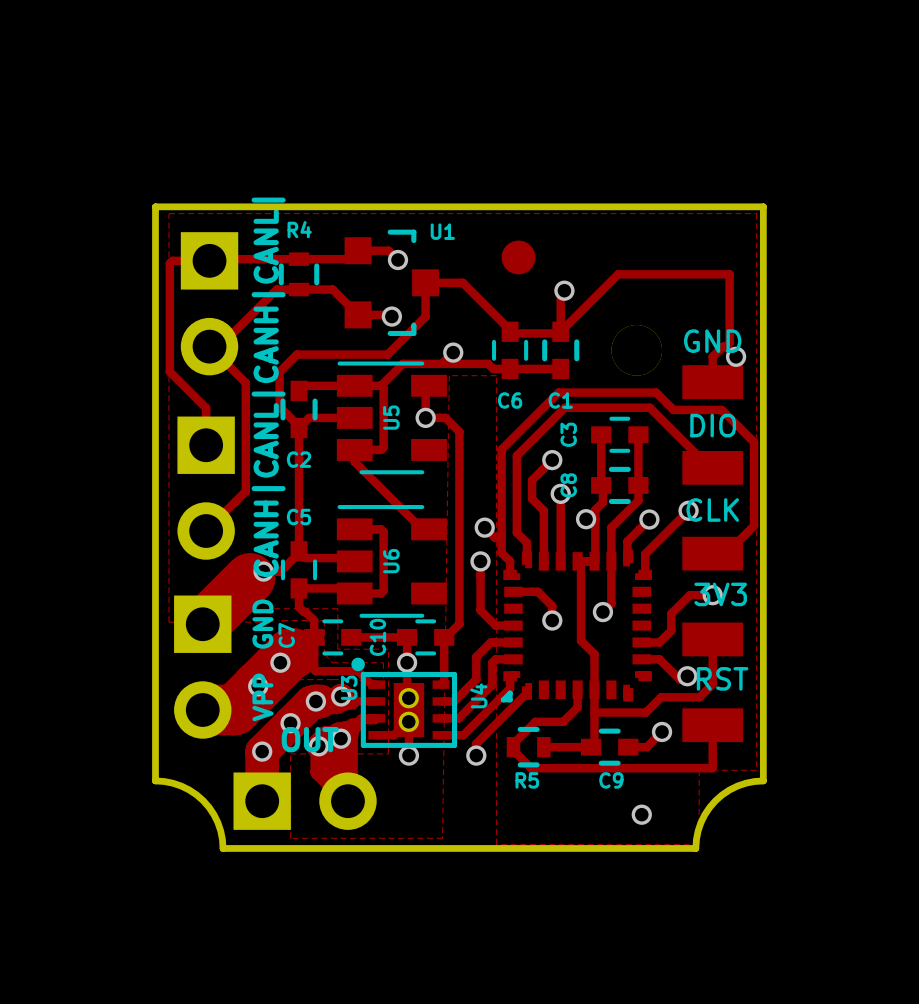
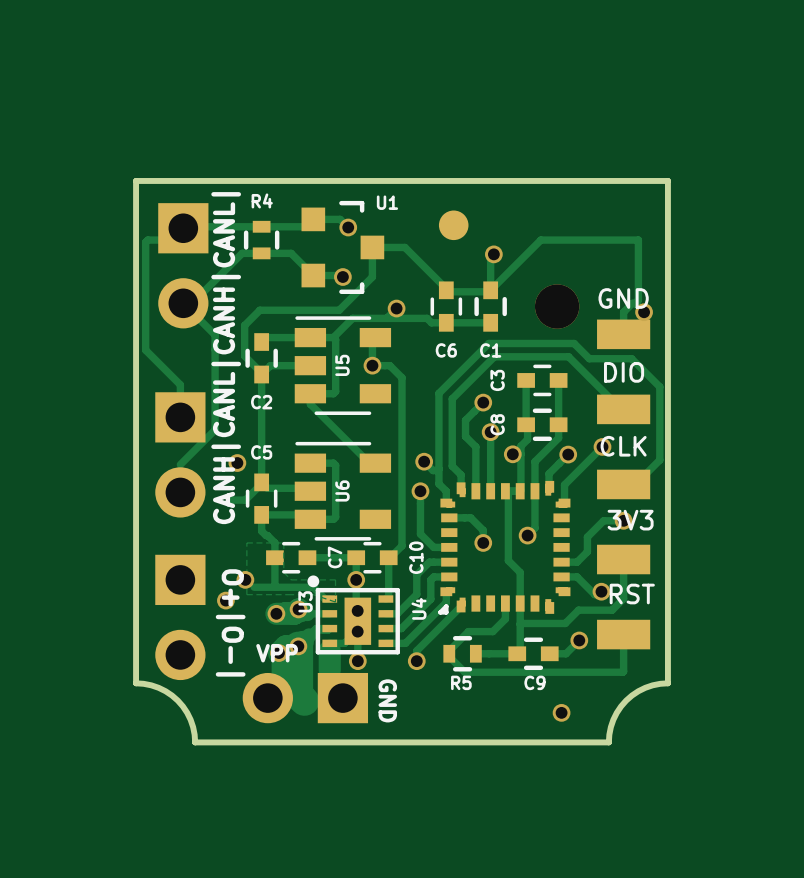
zone outline: (169, 213) (169, 622) (270, 622) (270, 608) (337, 608) (337, 649) (388, 649) (388, 753) (290, 753) (290, 838) (442, 838) (449, 375) (496, 375) (496, 844) (699, 844) (699, 770) (756, 770) (756, 213) (169, 213) -> none
track: (209, 260) (172, 260) (169, 263) (169, 371) (206, 408) (206, 439) -> (180, 240) (147, 240) (145, 242) (145, 350) (180, 384)
text position: CANH|CANL|CANH|CANL| (268, 387) -> CANH|CANL|CANH|CANL| (226, 358)
part position: (206, 488) -> (180, 454)
via position: (263, 571) -> (237, 463)
track: (250, 578) (202, 624) -> none
text rotation: 0° (262, 624) -> 180° (387, 700)
text position: GND (262, 624) -> GND (387, 700)
C7 name position: C7 (286, 635) -> C7 (335, 557)
C10 name position: C10 (377, 637) -> C10 (416, 557)
track: (293, 653) (234, 710) (202, 710) -> none
part position: (202, 667) -> (180, 617)
track: none -> (254, 587) (276, 587)
text rotation: 0° (262, 697) -> 90° clockwise (277, 653)
text position: VPP (262, 697) -> VPP (277, 653)
track: (320, 701) (311, 702) (262, 751) (262, 801) -> none
text: none -> O+|O-| (230, 622)
via: (290, 723) -> none
text: OUT (310, 739) -> none
track: none -> (329, 650) (329, 670) (357, 698)
via: (262, 751) -> none
part rotation: 0° (305, 801) -> 180° (305, 698)

